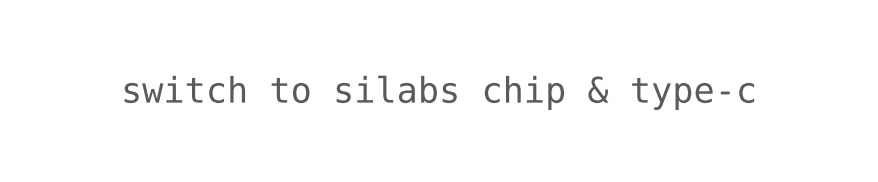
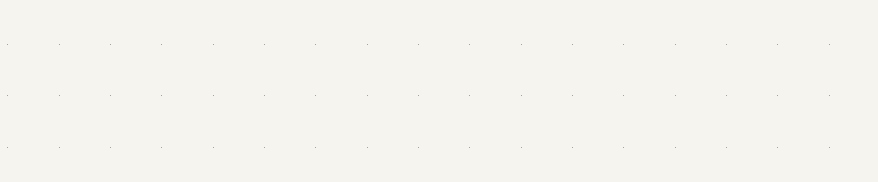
text: switch to silabs chip & type-c (439, 92) -> none

